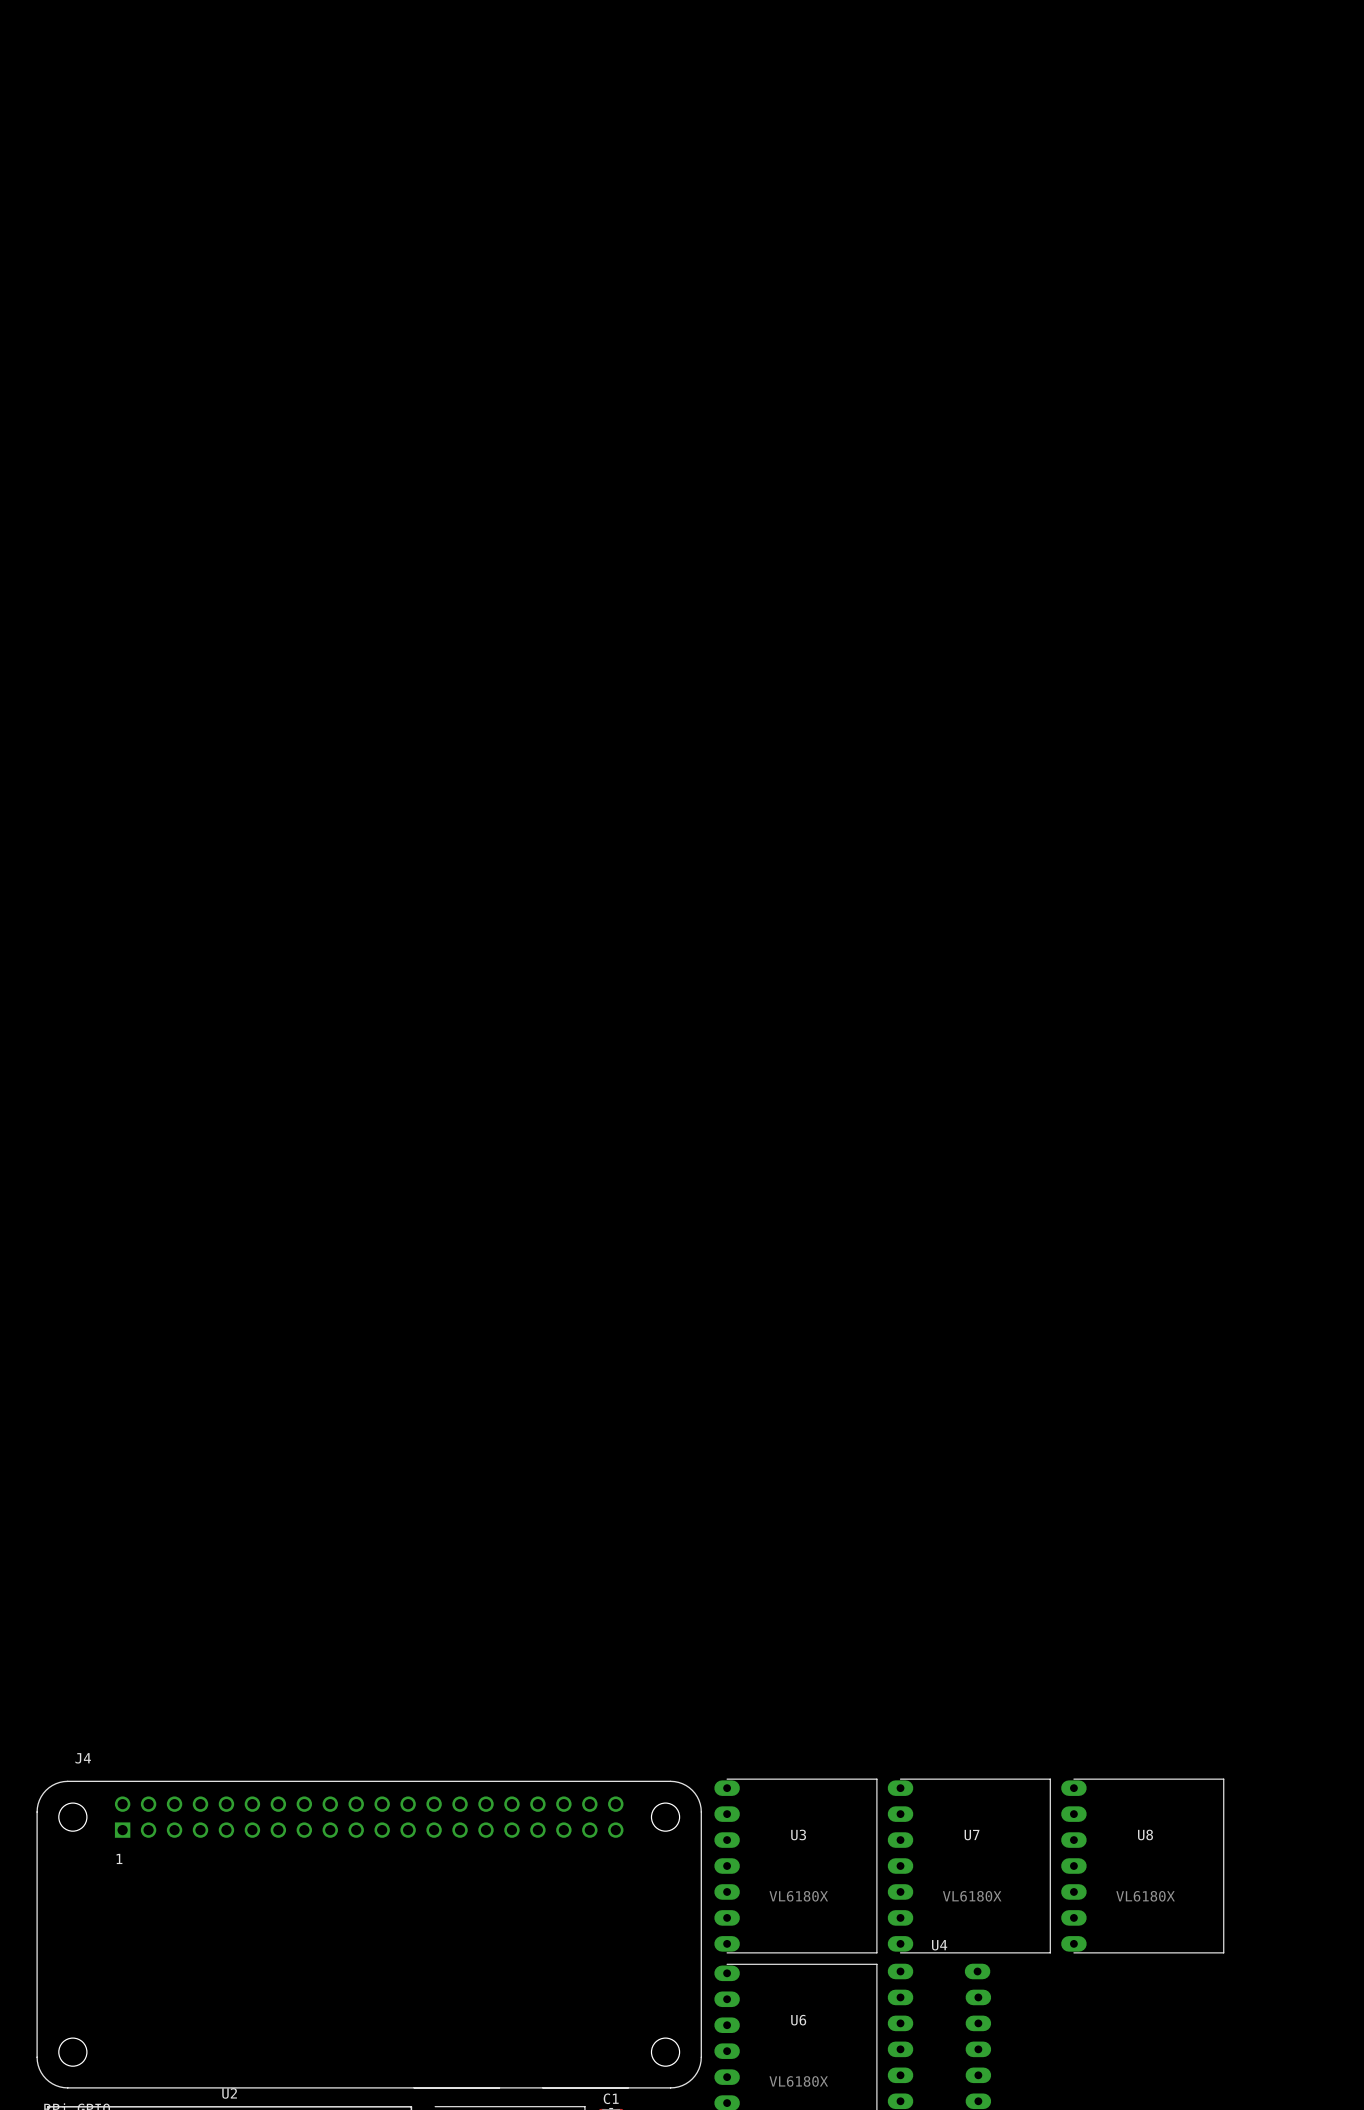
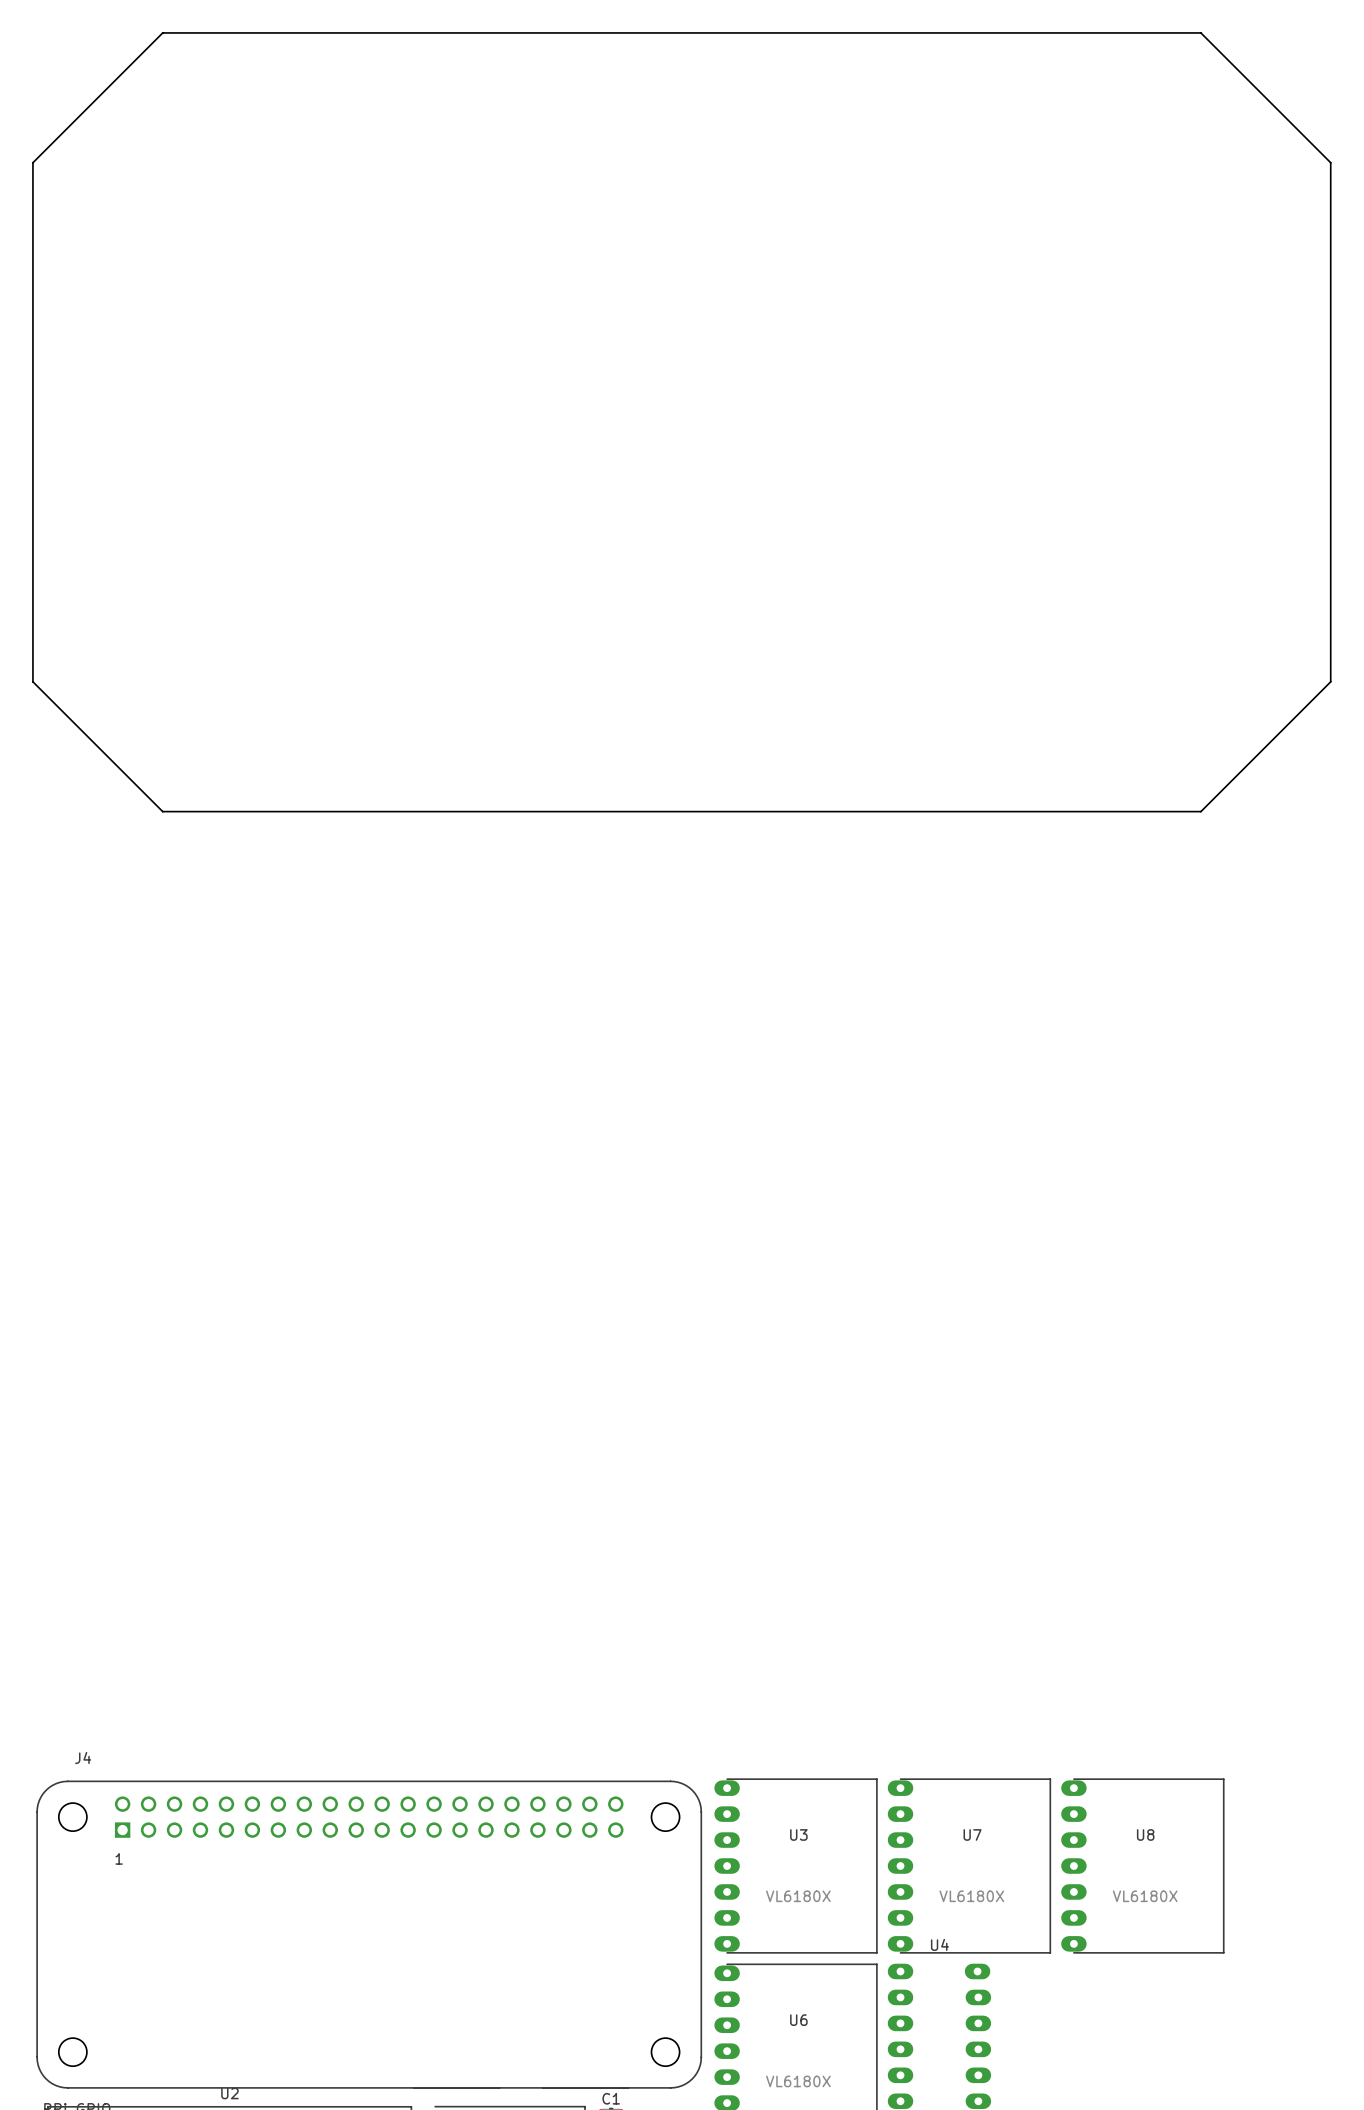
board edge: none -> (162, 32) (32, 162) (32, 681) (162, 811) (1200, 811) (1330, 681) (1330, 162) (1200, 32) (162, 32)

